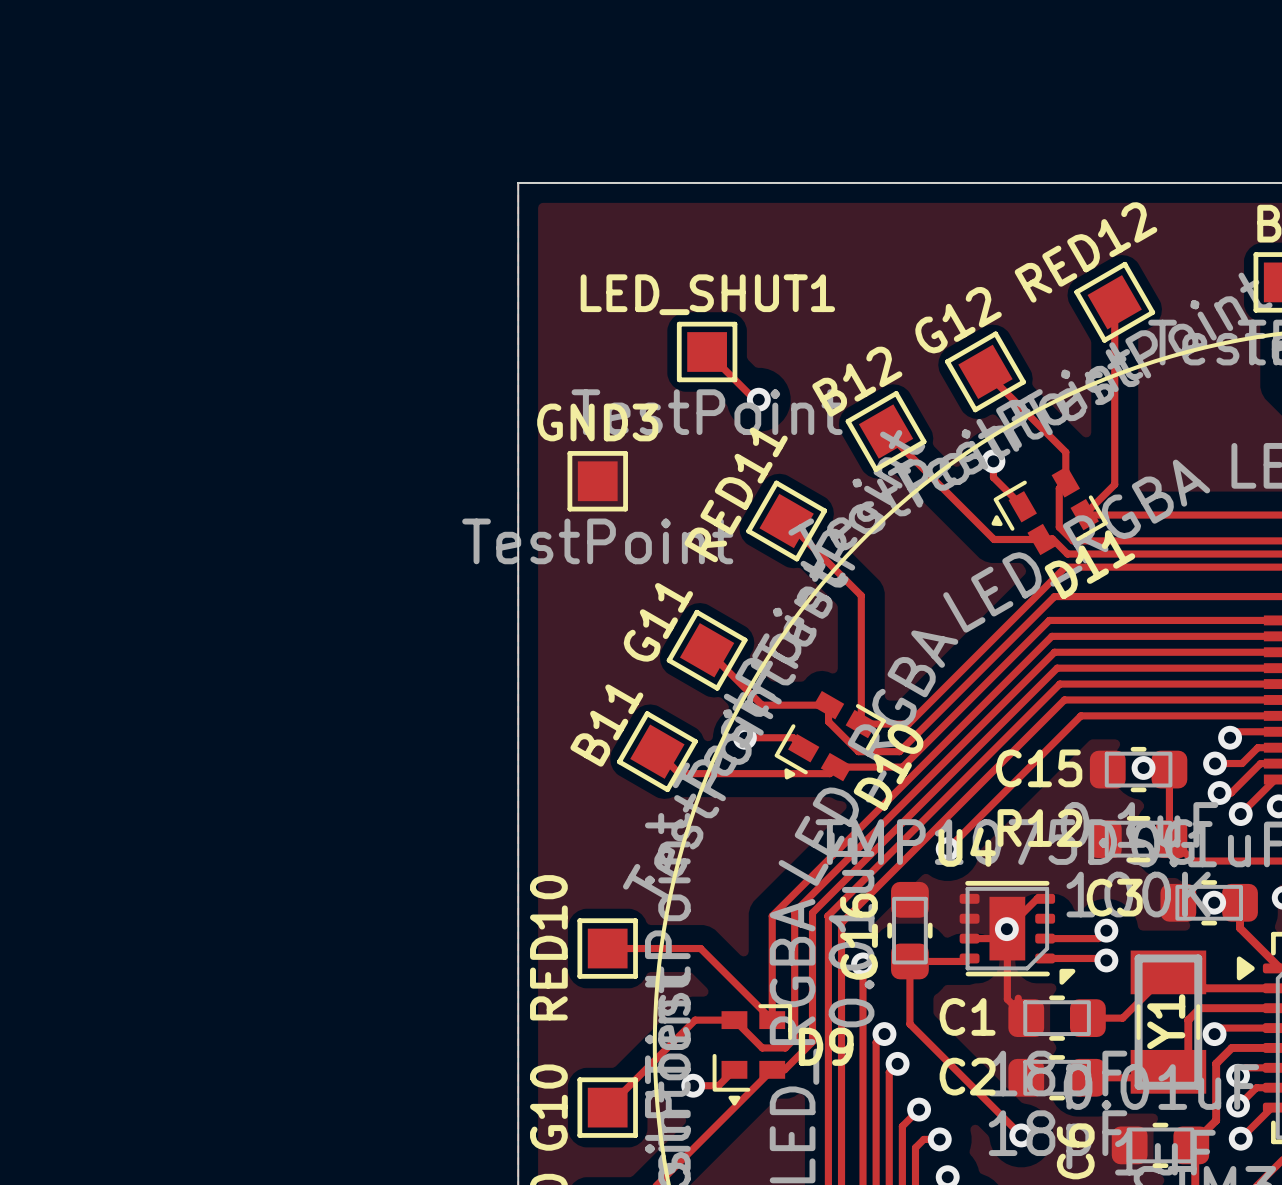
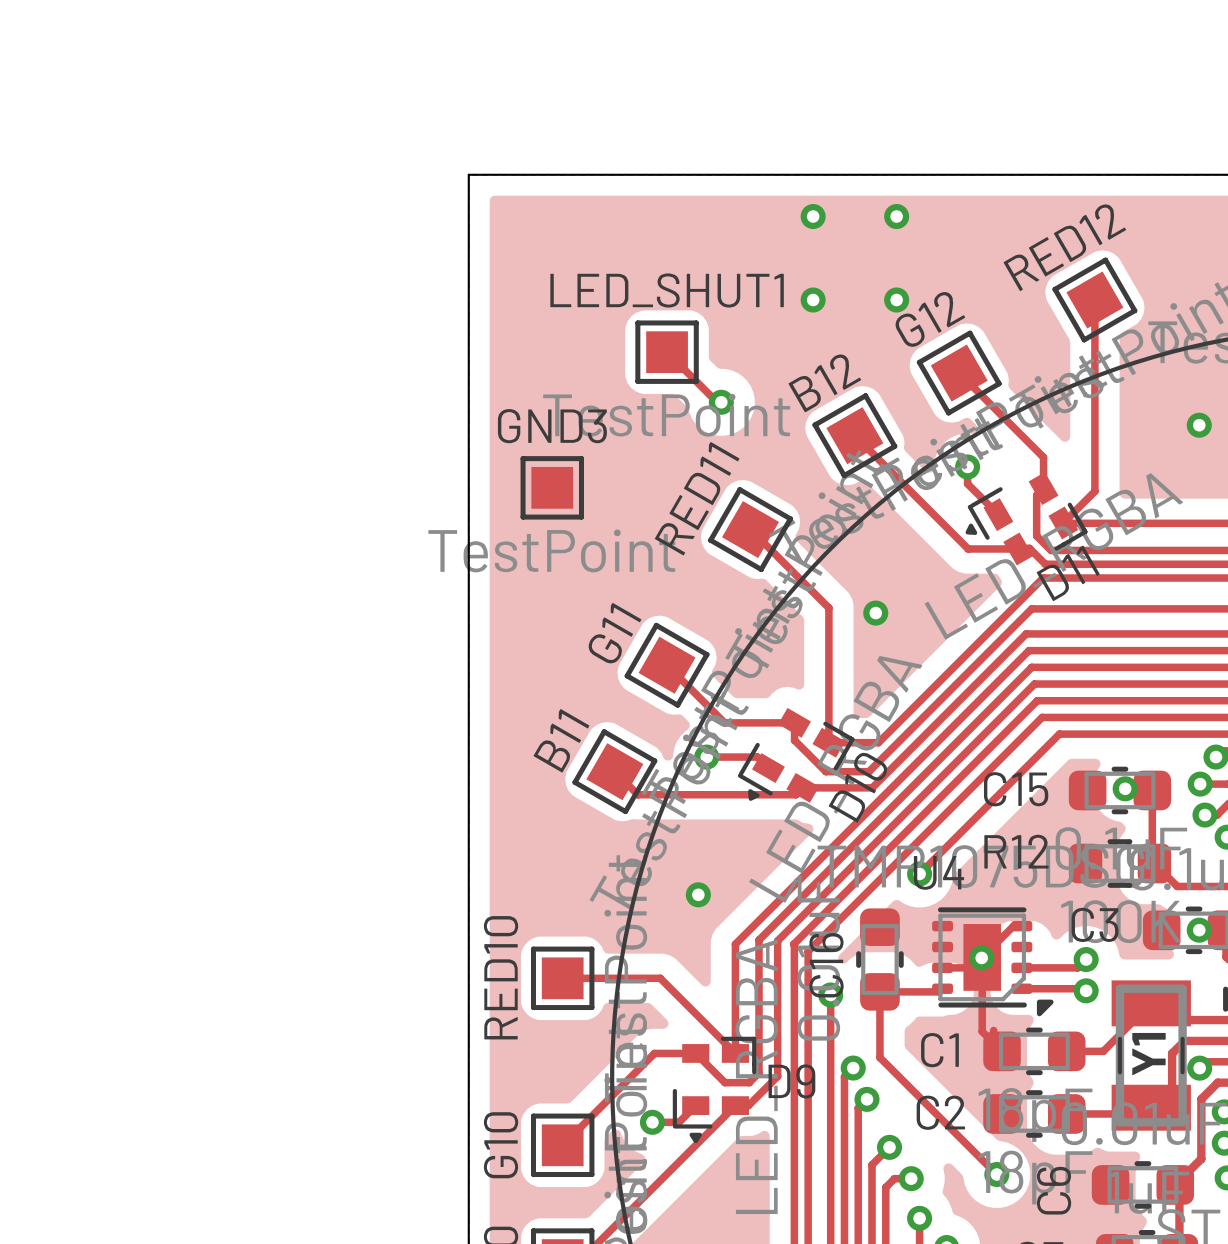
via: none -> (813, 216)
via: none -> (896, 216)
via: none -> (813, 300)
via: none -> (896, 300)
via: none -> (1199, 425)
via: none -> (875, 613)
via: none -> (698, 894)

